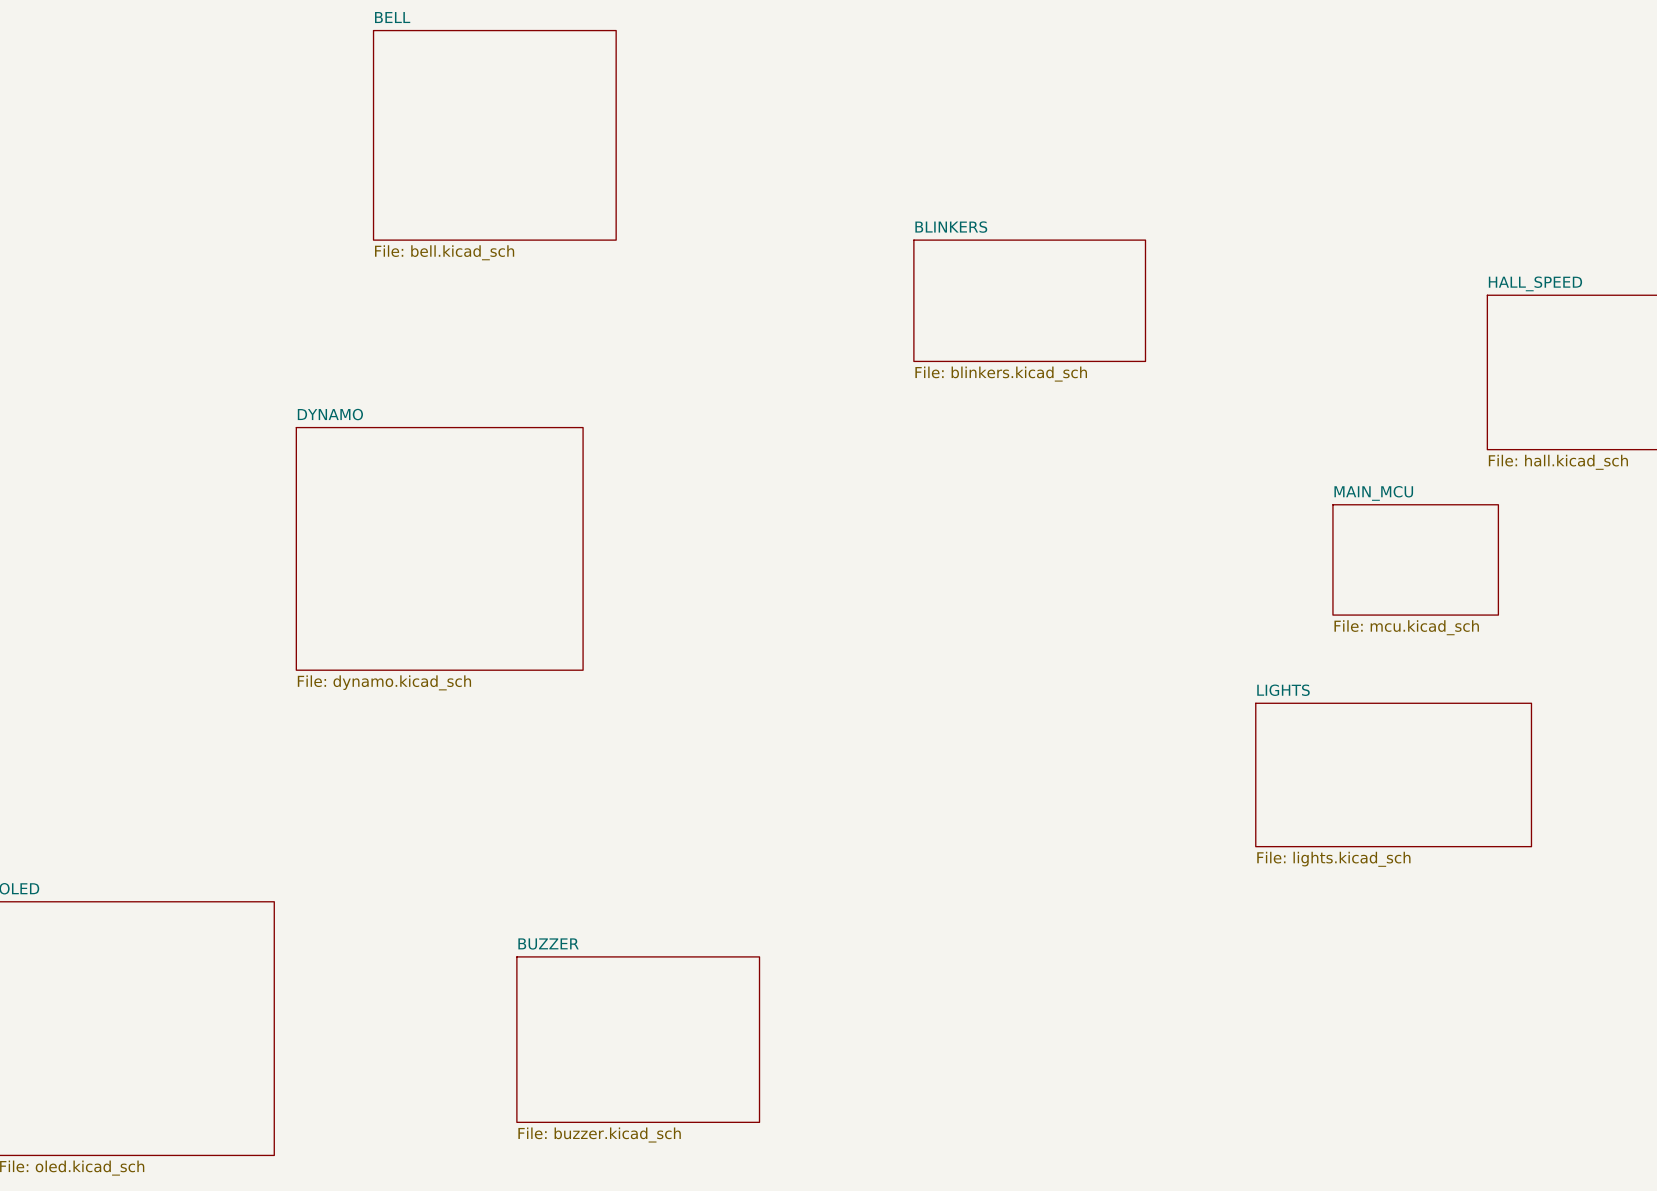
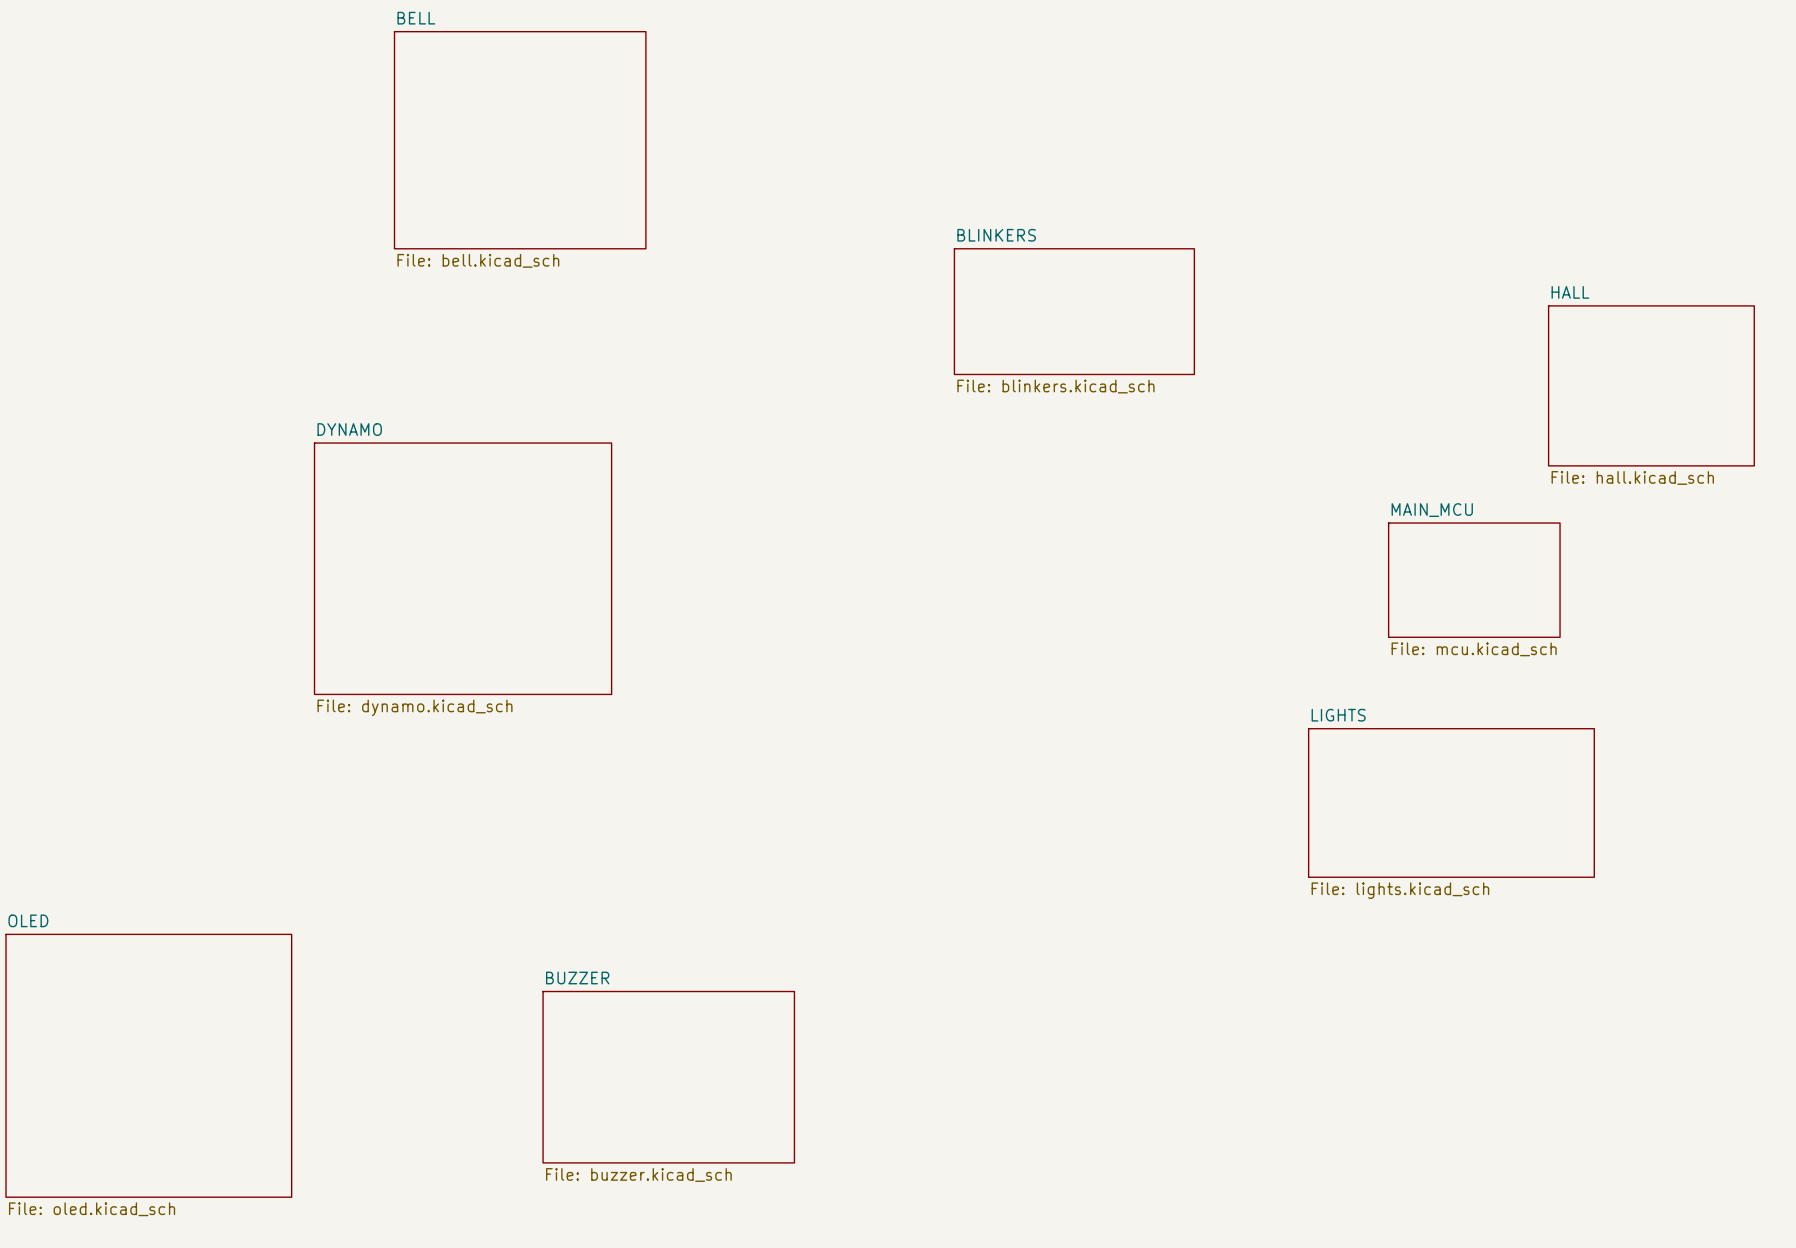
sheet HALL_SPEED name: HALL_SPEED (1535, 283) -> HALL (1570, 292)

